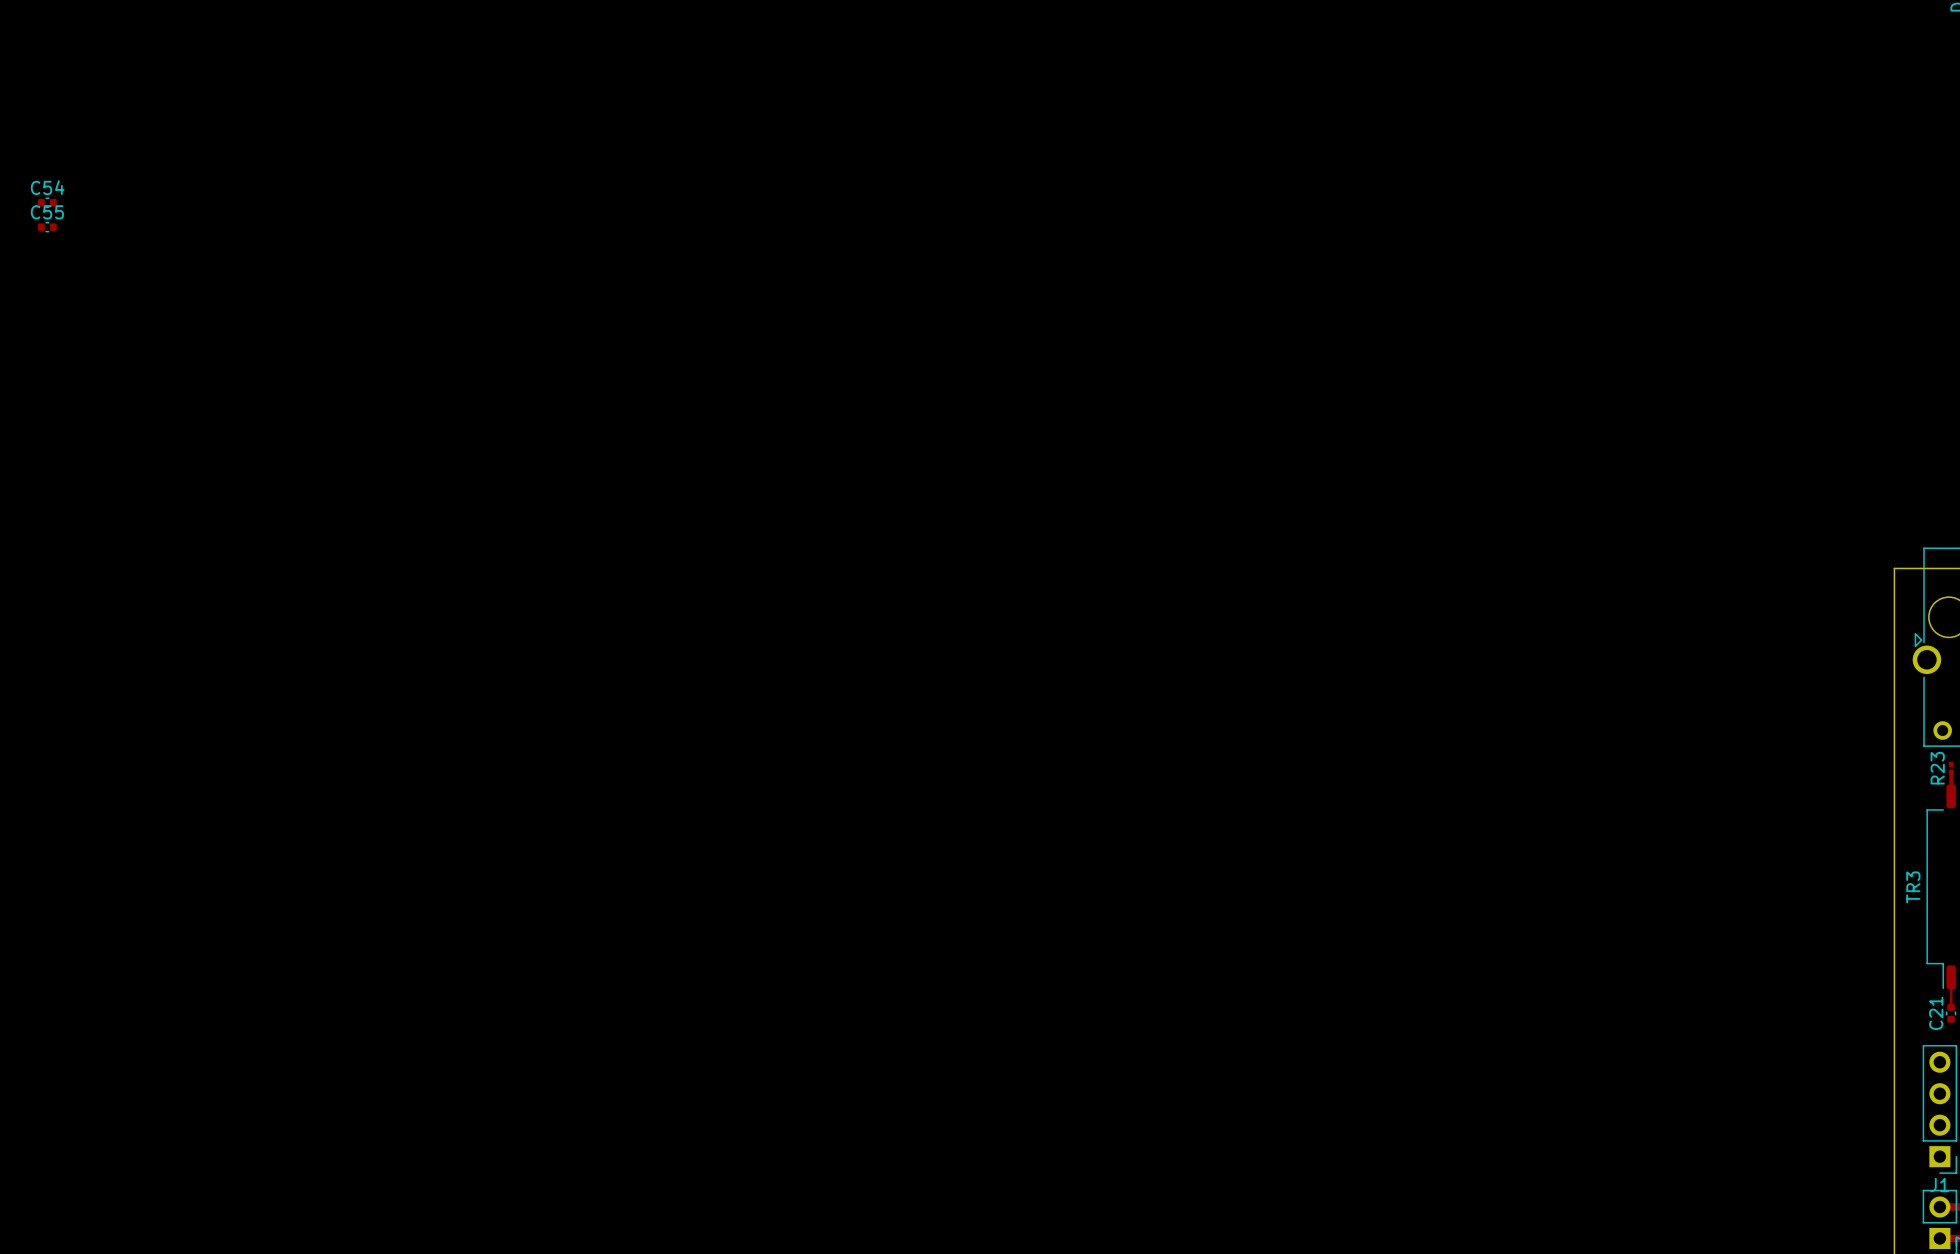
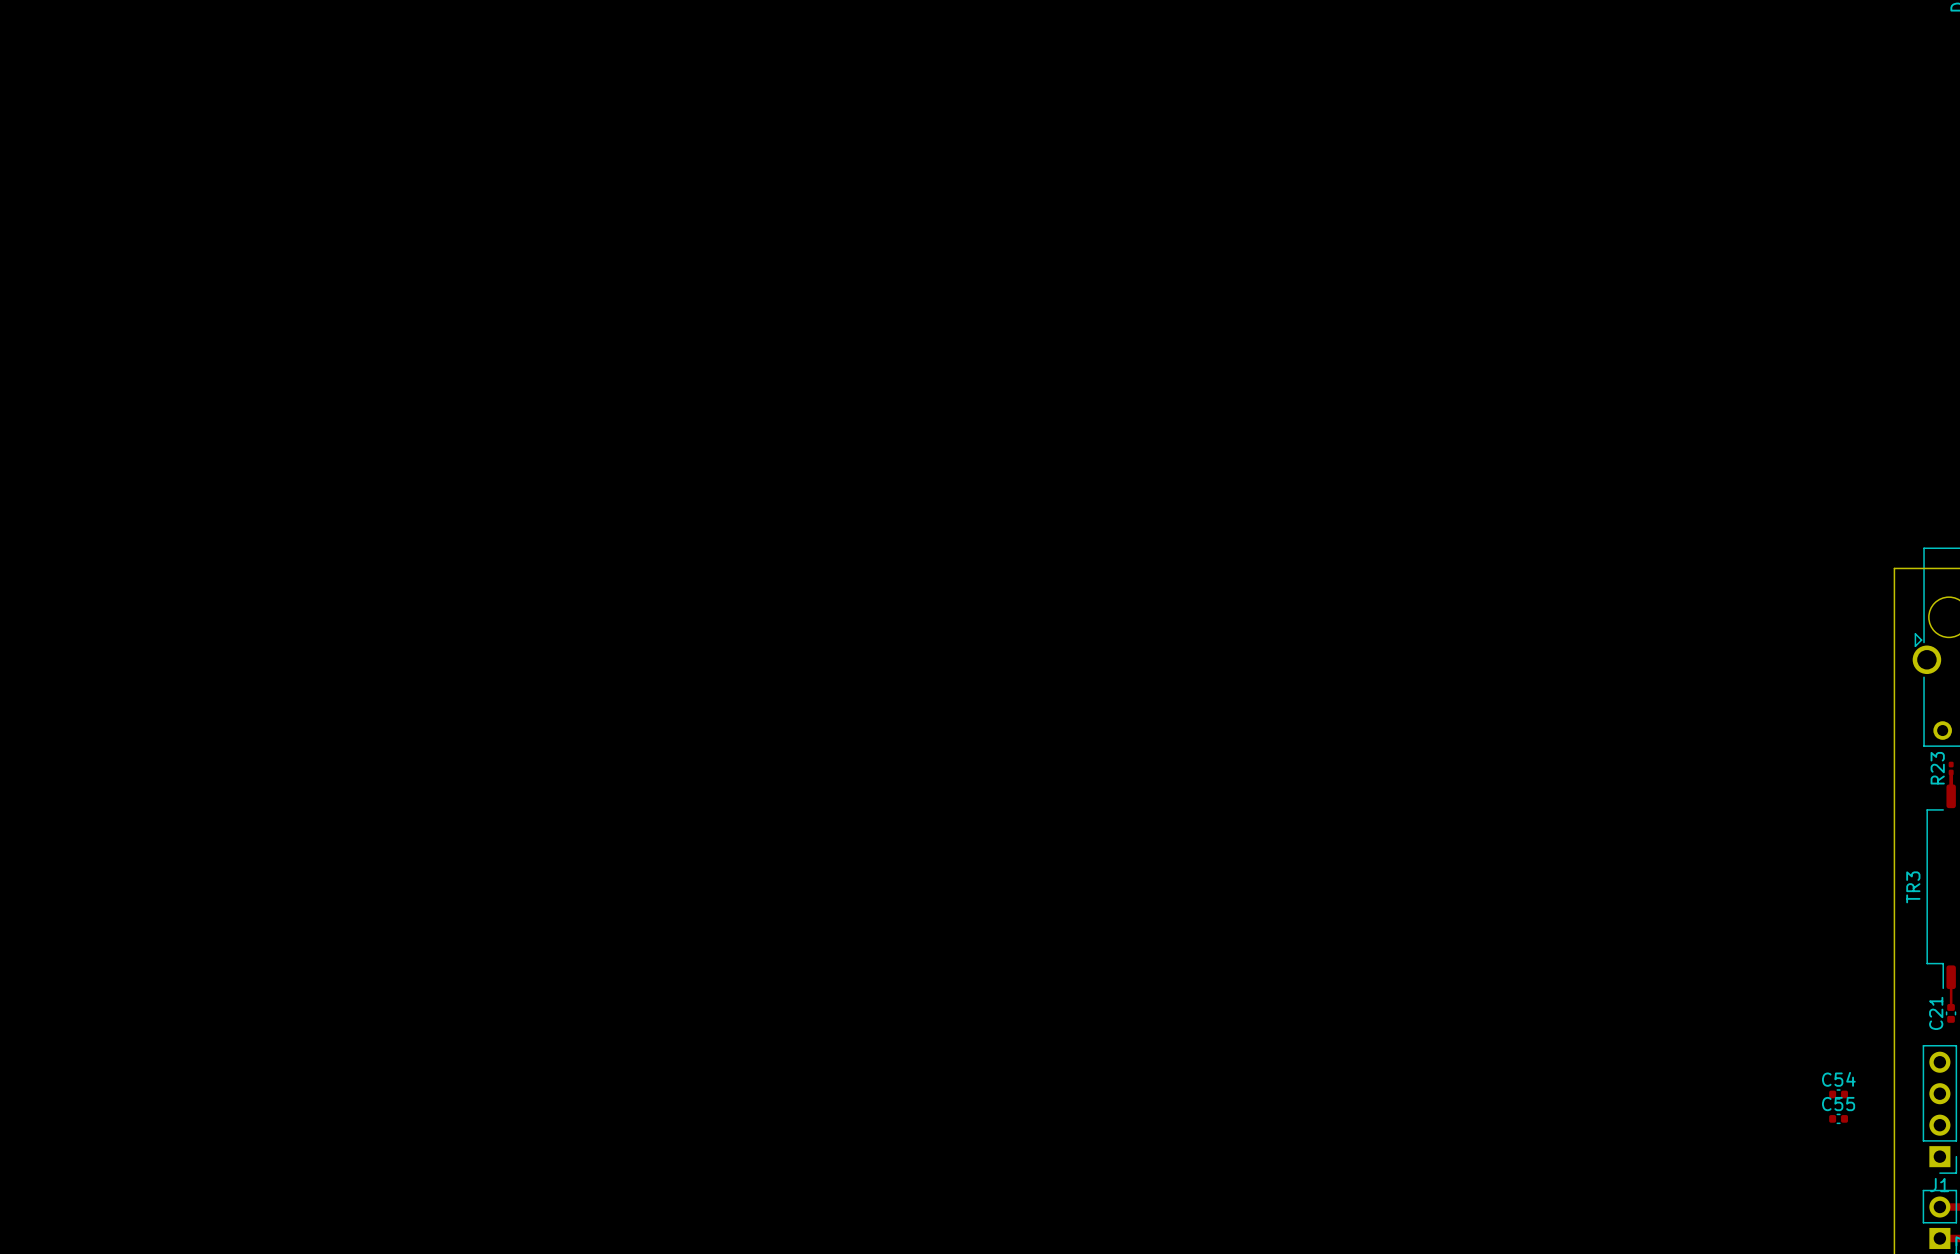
C54 position: (47, 202) -> (1838, 1094)
C55 position: (47, 227) -> (1838, 1118)

